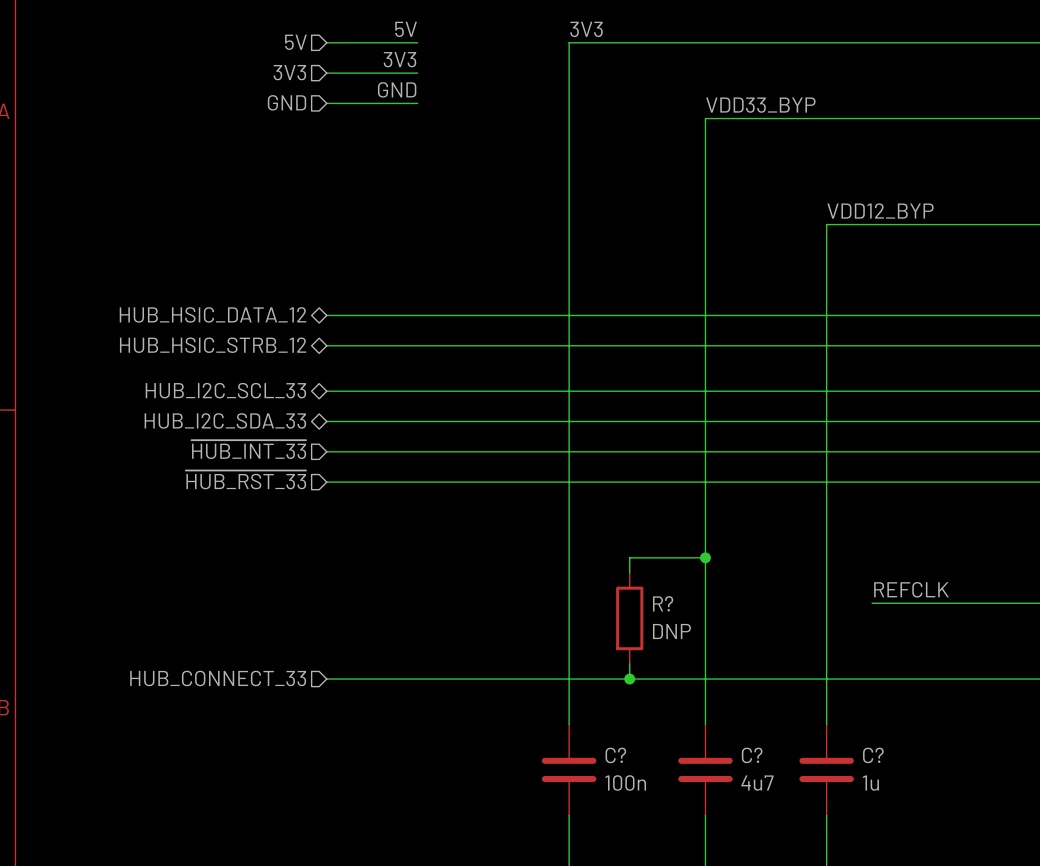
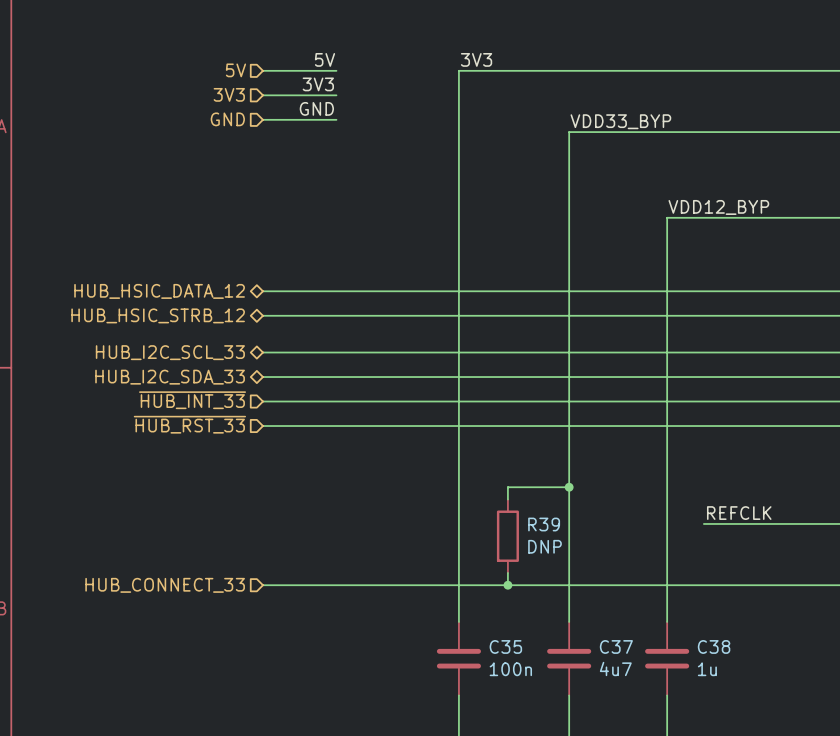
R? name: R? (663, 603) -> R39 (544, 524)
C? name: C? (615, 755) -> C35 (505, 646)
C? name: C? (752, 755) -> C37 (616, 646)
C? name: C? (873, 755) -> C38 (714, 646)

